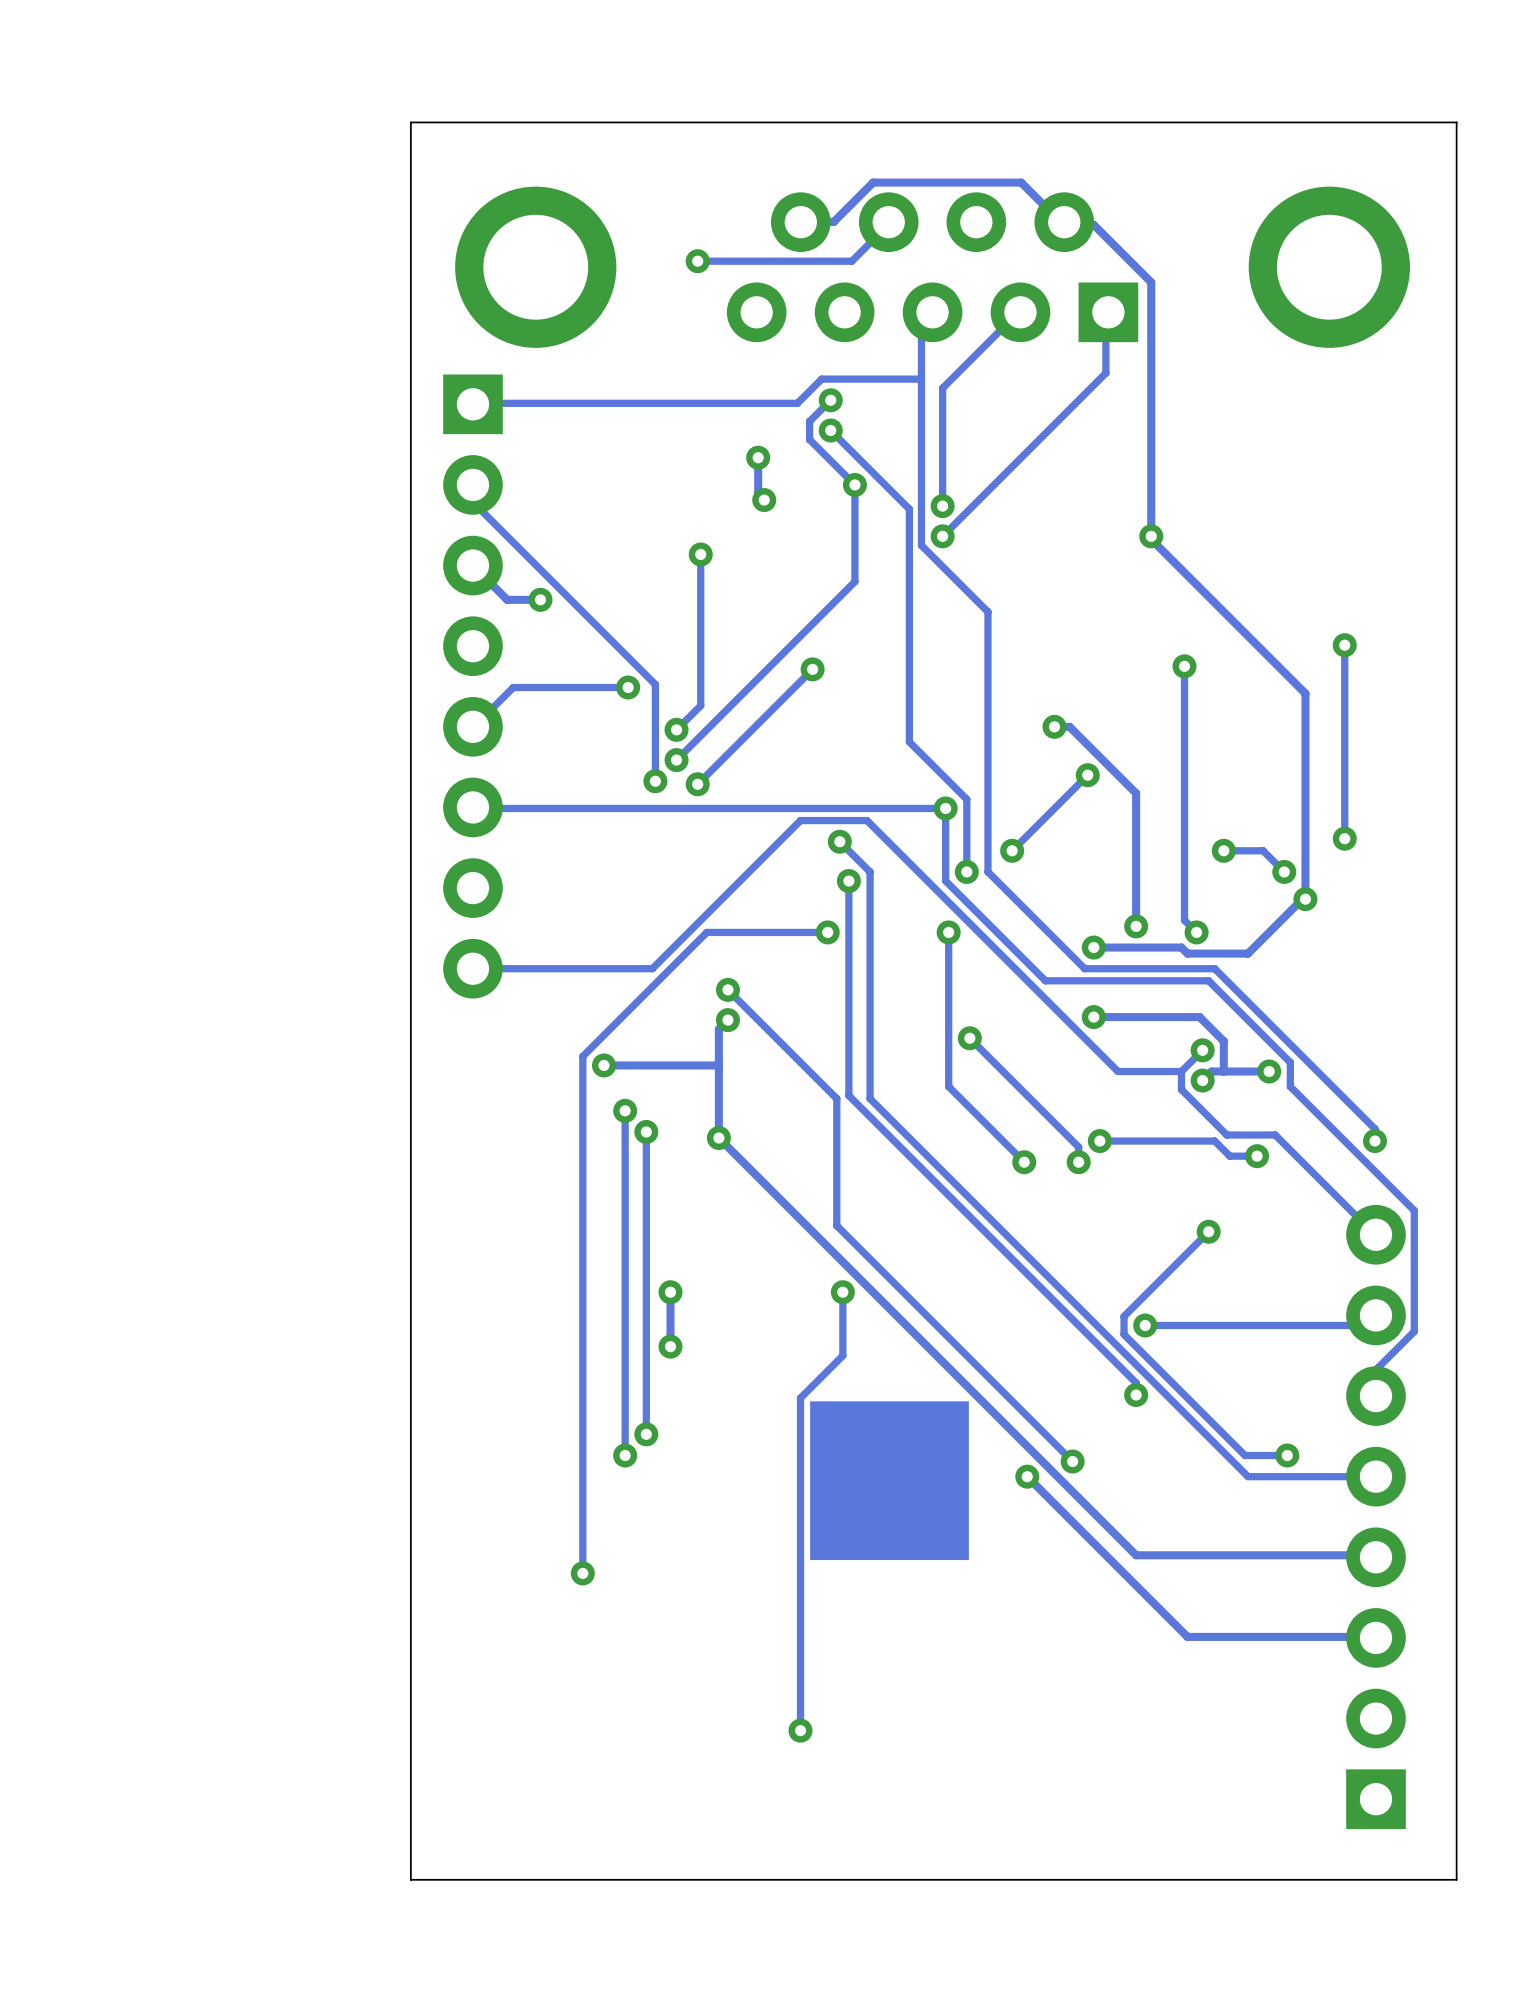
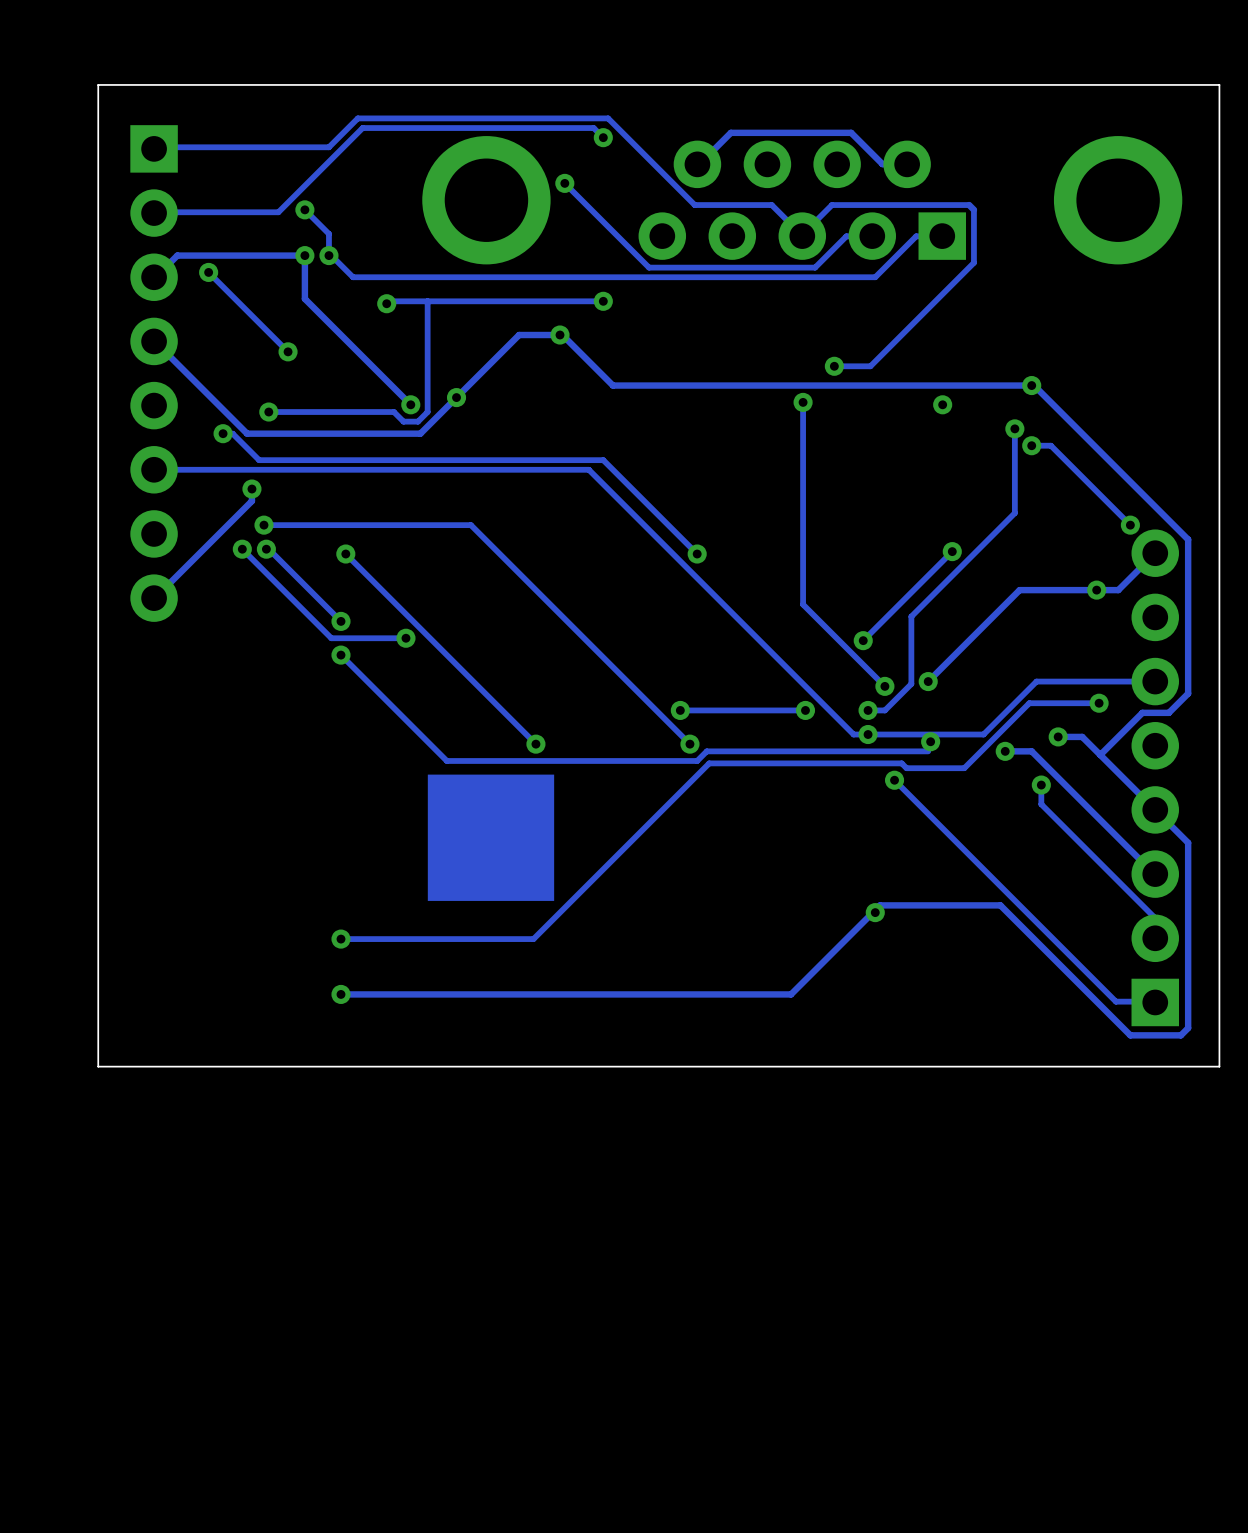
board edge: (410, 122) (410, 1879) (1456, 1879) (1456, 1355) -> (387, 84) (98, 84) (98, 1066) (1219, 1066)
track: (873, 182) (833, 221) (803, 221) -> (754, 132) (730, 132) (699, 164)
track: (994, 182) (1021, 182) (1060, 221) (1066, 224) (1093, 224) (1142, 273) -> (851, 132) (882, 164) (907, 164)
track: none -> (603, 137) (593, 128) (362, 128) (278, 212) (154, 213)
via: none -> (603, 137)
track: none -> (154, 148) (155, 147) (328, 147) (357, 118) (608, 118) (694, 205) (771, 205) (802, 236) (831, 205) (969, 205)
track: (888, 222) (851, 261) (697, 261) -> none
via: none -> (564, 183)
via: (697, 261) -> none
via: none -> (304, 209)
track: (1148, 279) (1151, 282) (1151, 539) (1305, 693) (1305, 899) (1302, 899) (1248, 953) (1187, 953) (1181, 947) (1093, 947) -> (973, 209) (973, 262) (870, 366) (834, 366)
track: (932, 312) (921, 321) (921, 545) (987, 611) (987, 871) (1084, 968) (1214, 968) (1374, 1128) (1374, 1141) -> none
track: (1018, 312) (942, 388) (942, 506) -> (870, 236) (846, 236) (815, 267) (649, 267) (564, 183)
track: (1105, 312) (1105, 373) (942, 536) -> (940, 236) (916, 236) (875, 277) (353, 277) (331, 255) (328, 255) (328, 233) (304, 209)
via: none -> (304, 255)
via: none -> (328, 255)
track: none -> (208, 272) (288, 351)
via: none -> (208, 272)
track: none -> (154, 277) (177, 255) (304, 255) (304, 298) (410, 404)
track: (921, 379) (821, 379) (797, 403) (472, 404) -> none
track: none -> (427, 301) (427, 412) (418, 421) (403, 421) (393, 412) (268, 412)
track: none -> (603, 301) (389, 301) (386, 303)
via: none -> (603, 301)
via: none -> (386, 303)
track: (830, 400) (809, 421) (809, 439) (854, 484) (854, 581) (676, 760) -> none
via: (830, 400) -> none
track: (830, 430) (909, 509) (909, 741) (966, 799) (966, 871) -> none
via: (830, 430) -> none
via: none -> (560, 335)
track: none -> (154, 341) (247, 433) (420, 433) (519, 335) (562, 335) (612, 385) (1034, 385) (1188, 539) (1188, 693) (1168, 712) (1142, 712) (1100, 754)
via: none -> (288, 351)
track: (758, 457) (758, 494) (764, 500) -> none
via: (758, 457) -> none
via: none -> (834, 366)
track: (472, 484) (473, 503) (655, 684) (655, 781) -> none
via: (854, 484) -> none
via: (764, 500) -> none
via: none -> (1031, 385)
via: (942, 506) -> none
via: none -> (456, 397)
track: none -> (803, 402) (803, 604) (884, 686)
via: none -> (803, 402)
via: none -> (410, 404)
via: none -> (942, 404)
via: none -> (268, 412)
via: (942, 536) -> none
via: (1151, 536) -> none
track: (700, 554) (700, 705) (676, 729) -> none
via: (700, 554) -> none
track: none -> (1014, 428) (1014, 513) (911, 616) (911, 683) (884, 710) (868, 710)
via: none -> (1014, 428)
track: none -> (223, 433) (232, 433) (259, 460) (603, 460) (697, 554)
via: none -> (223, 433)
track: (472, 565) (507, 599) (540, 599) -> none
track: none -> (1031, 445) (1050, 445) (1130, 525)
via: none -> (1031, 445)
via: (540, 599) -> none
track: none -> (154, 469) (588, 469) (853, 734) (983, 734) (1036, 681) (1155, 681)
track: none -> (251, 489) (251, 501) (154, 598)
via: none -> (251, 489)
track: (1344, 645) (1344, 838) -> none
via position: (1344, 645) -> (1130, 525)
track: (1184, 666) (1184, 920) (1196, 932) -> none
via: (1184, 666) -> none
track: (812, 669) (697, 784) -> none
via position: (812, 669) -> (697, 554)
track: none -> (263, 525) (470, 525) (689, 744)
via: none -> (263, 525)
part position: (472, 686) -> (154, 373)
track: (628, 687) (513, 687) (472, 726) -> none
via: (628, 687) -> none
track: none -> (242, 549) (331, 638) (405, 638)
via: none -> (242, 549)
track: none -> (266, 549) (268, 549) (341, 621)
via: none -> (266, 549)
track: none -> (952, 551) (863, 640)
via: none -> (952, 551)
track: none -> (1155, 553) (1118, 590) (1019, 590) (928, 681)
track: none -> (345, 554) (535, 744)
via: none -> (345, 554)
track: (1054, 726) (1069, 726) (1136, 793) (1136, 926) -> none
via: (1054, 726) -> none
via: (676, 729) -> none
via: none -> (1096, 590)
via: (676, 760) -> none
track: (1087, 775) (1012, 850) -> none
via: (1087, 775) -> none
via: (655, 781) -> none
via: (697, 784) -> none
via: none -> (341, 621)
track: (472, 807) (945, 808) (945, 881) (1045, 980) (1063, 980) -> (341, 939) (533, 939) (709, 763) (901, 763) (906, 768)
via: (945, 808) -> none
via: none -> (405, 638)
via: none -> (863, 640)
track: none -> (341, 655) (446, 760) (697, 760) (706, 751) (928, 751)
via: none -> (341, 655)
via: (1344, 838) -> none
track: (839, 841) (870, 871) (870, 1098) (1248, 1476) (1375, 1476) -> none
via: (839, 841) -> none
via: (1012, 850) -> none
track: (1223, 850) (1263, 850) (1284, 871) -> none
via: (1223, 850) -> none
via: (966, 871) -> none
via: none -> (928, 681)
via: (1284, 871) -> none
via: none -> (884, 686)
track: (848, 881) (848, 1095) (1136, 1382) (1136, 1395) -> none
via: (848, 881) -> none
via: none -> (680, 710)
track: none -> (805, 710) (680, 710)
via: none -> (805, 710)
via: none -> (868, 710)
via: (1136, 926) -> none
track: (827, 932) (706, 932) (582, 1056) (582, 1573) -> none
via: (827, 932) -> none
track: (948, 932) (948, 1086) (1024, 1162) -> none
via: (948, 932) -> none
via position: (1196, 932) -> (1005, 751)
via: none -> (868, 734)
track: none -> (1058, 736) (1082, 736) (1188, 842) (1188, 1028) (1180, 1035) (1130, 1035) (1000, 905) (880, 905) (791, 994) (341, 994)
via: none -> (1058, 736)
via: none -> (535, 744)
via: none -> (689, 744)
track: none -> (1005, 751) (1031, 751) (1155, 874)
track: (472, 968) (652, 968) (800, 820) (867, 820) (1117, 1071) (1181, 1071) -> none
track: (1136, 980) (1208, 980) (1290, 1062) (1290, 1086) (1414, 1210) (1414, 1331) (1378, 1367) (1378, 1395) (1375, 1396) -> (964, 768) (1029, 703) (1091, 703)
track: (727, 989) (836, 1098) (836, 1225) (1072, 1461) -> none
via: (727, 989) -> none
part: none -> (1155, 777)
track: none -> (894, 780) (1115, 1001) (1155, 1002)
via: none -> (894, 780)
track: none -> (1041, 785) (1041, 804) (1154, 917) (1155, 938)
via: none -> (1041, 785)
track: (1093, 1017) (1199, 1017) (1223, 1041) (1223, 1071) -> none
via: (1093, 1017) -> none
track: (727, 1020) (718, 1029) (718, 1138) (1136, 1555) (1374, 1555) (1375, 1557) -> none
via: (727, 1020) -> none
track: (969, 1038) (1078, 1147) (1078, 1162) -> none
via: (969, 1038) -> none
track: (1202, 1050) (1181, 1071) -> none
via: (1202, 1050) -> none
via: (603, 1065) -> none
track: (718, 1065) (603, 1065) -> none
track: (1181, 1071) (1181, 1089) (1226, 1135) (1275, 1135) (1375, 1234) -> none
track: (1269, 1071) (1211, 1071) (1202, 1080) -> none
via: (1269, 1071) -> none
via: (1202, 1080) -> none
track: (625, 1110) (625, 1455) -> none
via: (625, 1110) -> none
track: (646, 1131) (646, 1434) -> none
via: (646, 1131) -> none
via: (718, 1138) -> none
track: (1099, 1141) (1214, 1141) (1229, 1156) (1257, 1156) -> none
via: (1099, 1141) -> none
via: (1374, 1141) -> none
via: (1257, 1156) -> none
via: (1078, 1162) -> none
via: none -> (341, 939)
track: (1208, 1231) (1124, 1316) (1124, 1334) (1244, 1455) (1287, 1455) -> none
via: (1208, 1231) -> none
via: none -> (341, 994)
track: (670, 1292) (670, 1346) -> none
via: (670, 1292) -> none
track: (842, 1292) (842, 1355) (800, 1398) (800, 1730) -> none
via: (842, 1292) -> none
track: (1375, 1315) (1365, 1325) (1145, 1325) -> none
via: (1145, 1325) -> none
via: (670, 1346) -> none
via: (1136, 1395) -> none
via: (646, 1434) -> none
via: (625, 1455) -> none
via: (1287, 1455) -> none
via: (1072, 1461) -> none
track: (1027, 1476) (1187, 1636) (1375, 1637) -> none
via: (1027, 1476) -> none
part position: (889, 1480) -> (490, 837)
part: (1375, 1516) -> none
via: (582, 1573) -> none
via: (800, 1730) -> none

